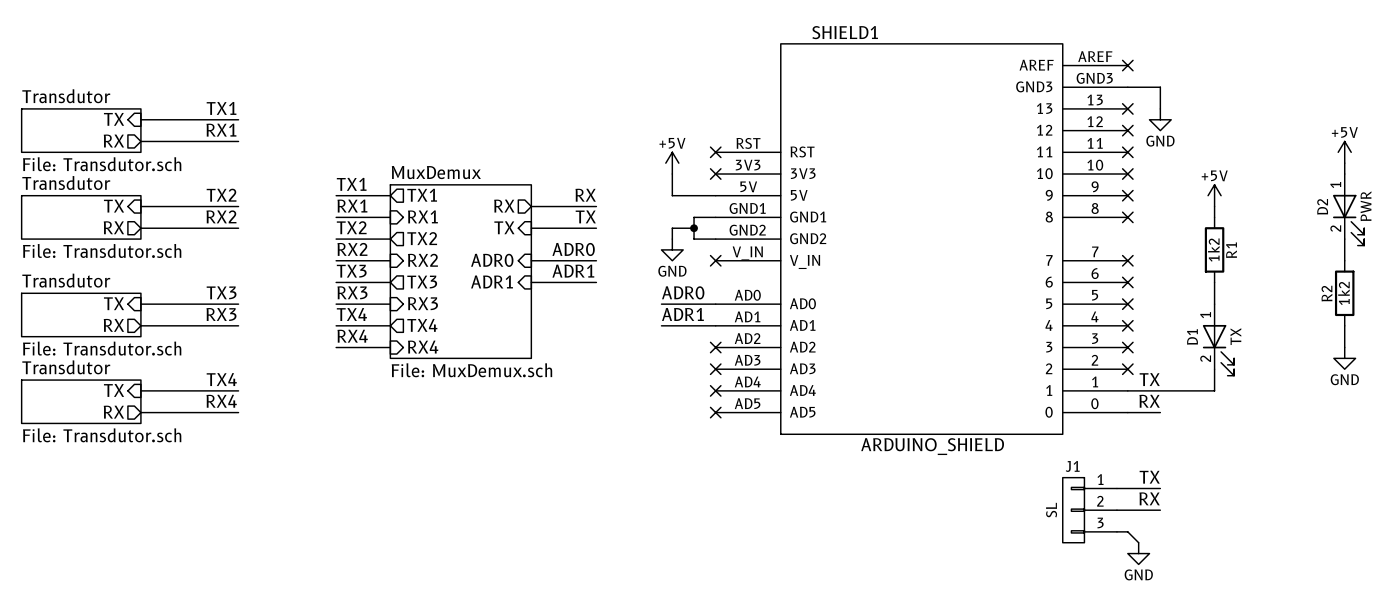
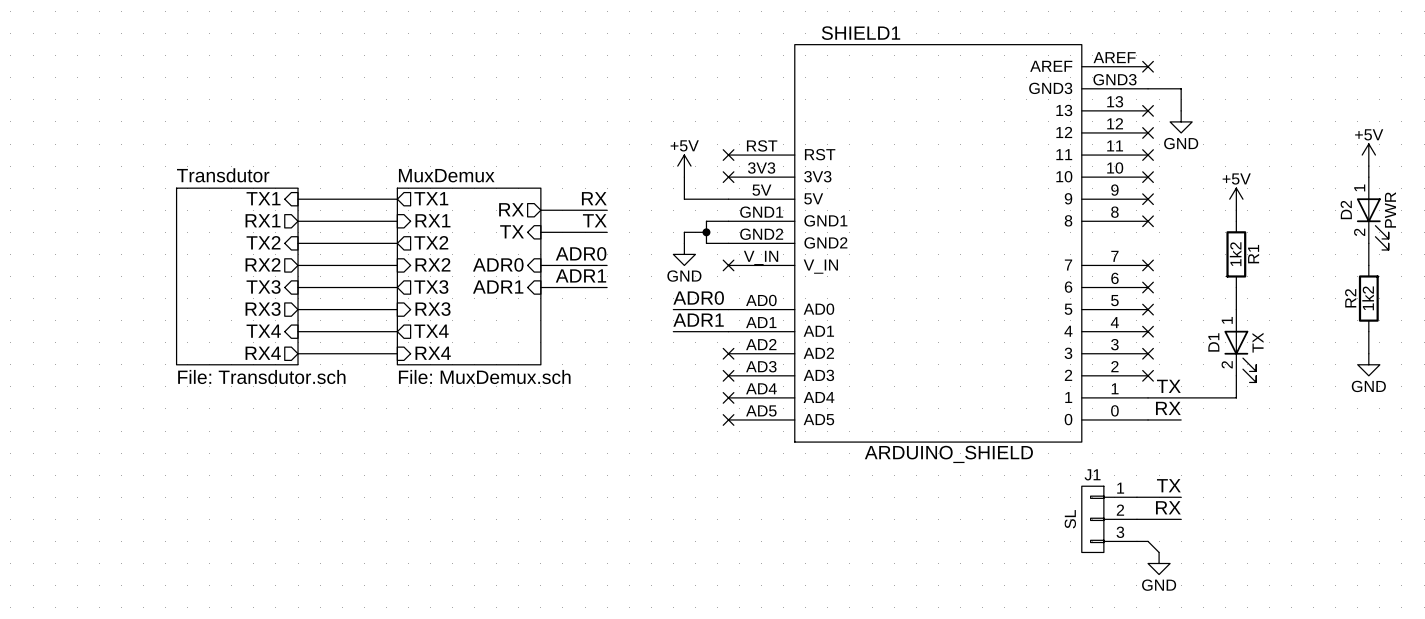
label: TX1 (221, 108) -> none
sheet pin: TX (114, 119) -> none
wire: (140, 119) (238, 119) -> none
sheet Transdutor: File: Transdutor.sch (81, 130) -> none
label: RX1 (221, 130) -> none
sheet pin: RX (113, 140) -> none
wire: (140, 141) (238, 141) -> none
label: TX1 (351, 184) -> none
label: TX2 (221, 195) -> none
sheet pin: none -> TX1 (263, 198)
wire: none -> (298, 199) (342, 199)
sheet pin: TX (114, 206) -> none
wire: (140, 206) (238, 206) -> none
label: RX1 (352, 206) -> none
label: RX2 (221, 216) -> none
sheet pin: none -> RX1 (263, 220)
sheet Transdutor: File: Transdutor.sch (81, 217) -> none
wire: none -> (298, 221) (342, 221)
sheet pin: RX (113, 227) -> none
label: TX2 (351, 227) -> none
wire: (140, 228) (238, 228) -> none
sheet pin: none -> TX2 (263, 242)
wire: none -> (298, 243) (342, 243)
label: RX2 (352, 249) -> none
sheet pin: none -> RX2 (263, 264)
wire: none -> (298, 265) (342, 265)
sheet Transdutor: none -> File: Transdutor.sch (237, 276)
label: TX3 (351, 271) -> none
sheet pin: none -> TX3 (263, 287)
wire: none -> (298, 287) (342, 287)
label: TX3 (221, 292) -> none
label: RX3 (352, 292) -> none
sheet pin: TX (114, 303) -> none
sheet pin: none -> RX3 (263, 309)
wire: (140, 304) (238, 304) -> none
wire: none -> (298, 309) (342, 309)
sheet Transdutor: File: Transdutor.sch (81, 314) -> none
label: RX3 (221, 314) -> none
label: TX4 (351, 314) -> none
sheet pin: RX (113, 325) -> none
wire: (140, 325) (238, 325) -> none
sheet pin: none -> TX4 (263, 331)
wire: none -> (298, 331) (342, 331)
label: RX4 (352, 336) -> none
sheet pin: none -> RX4 (263, 353)
wire: none -> (298, 353) (342, 353)
label: TX4 (221, 379) -> none
sheet pin: TX (114, 390) -> none
wire: (140, 390) (238, 390) -> none
sheet Transdutor: File: Transdutor.sch (81, 401) -> none
label: RX4 (221, 401) -> none
sheet pin: RX (113, 412) -> none
wire: (140, 412) (238, 412) -> none

